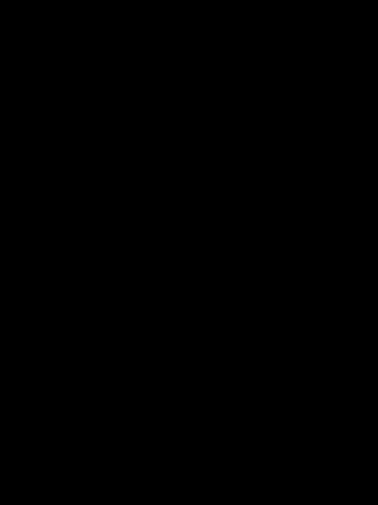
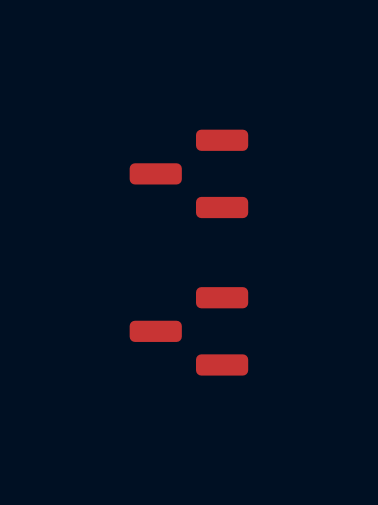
part: none -> (188, 173)
part: none -> (188, 331)

